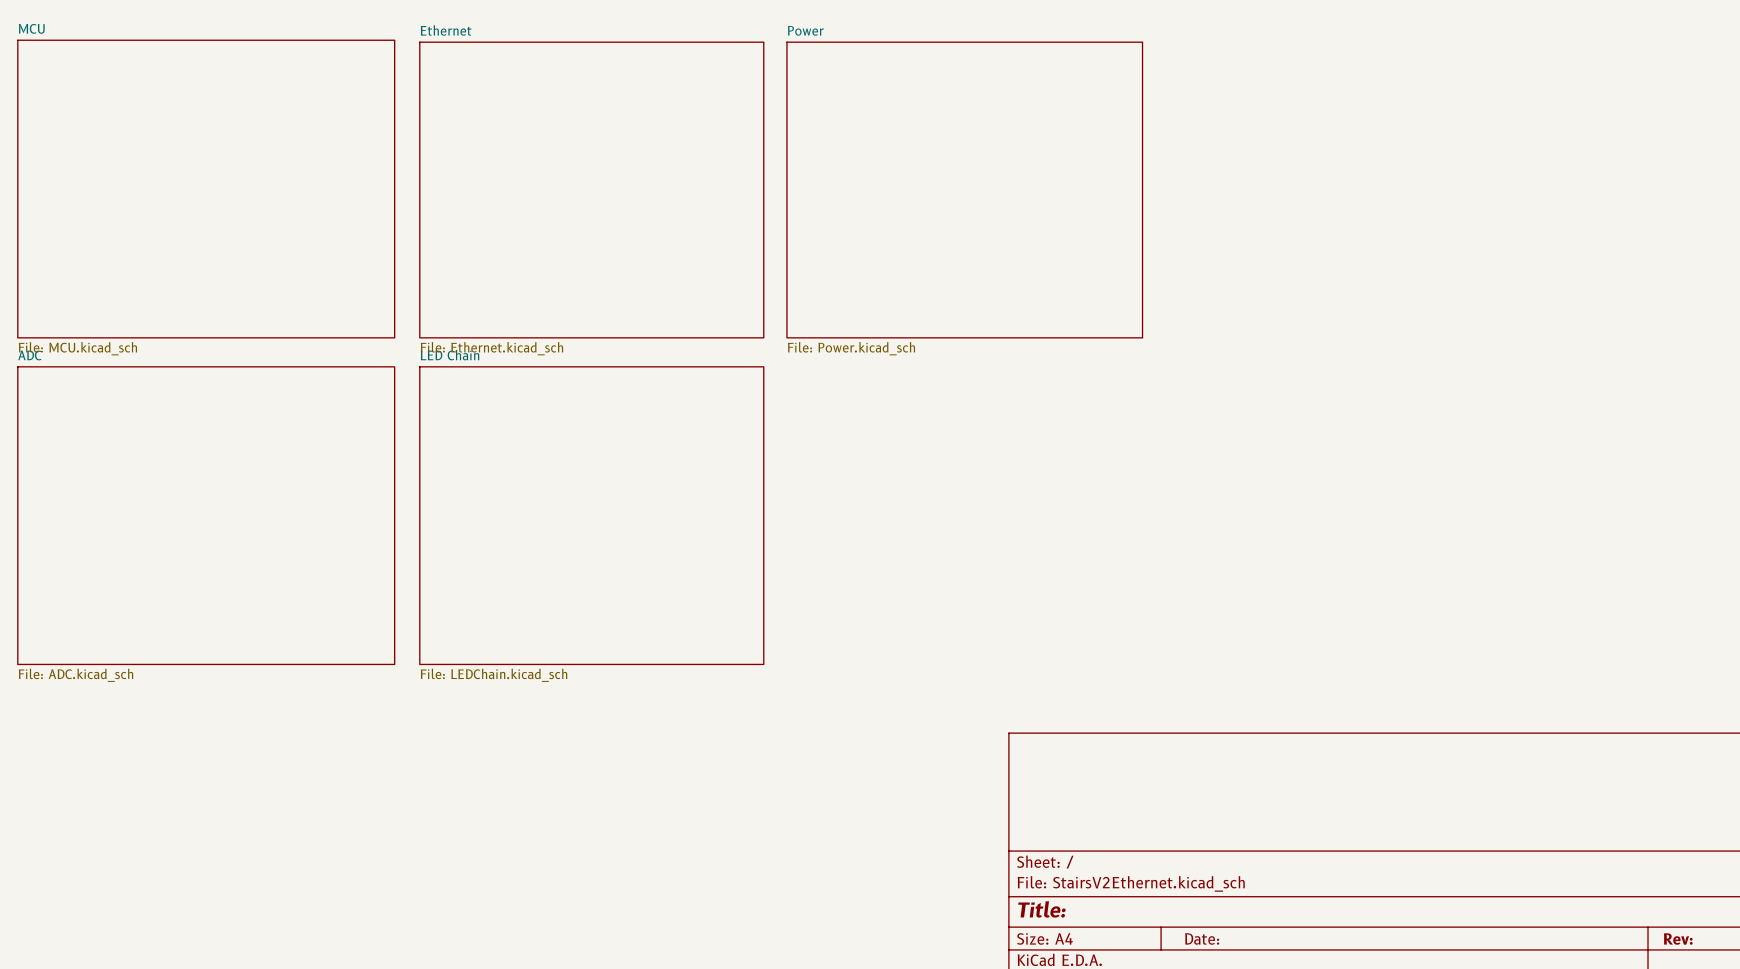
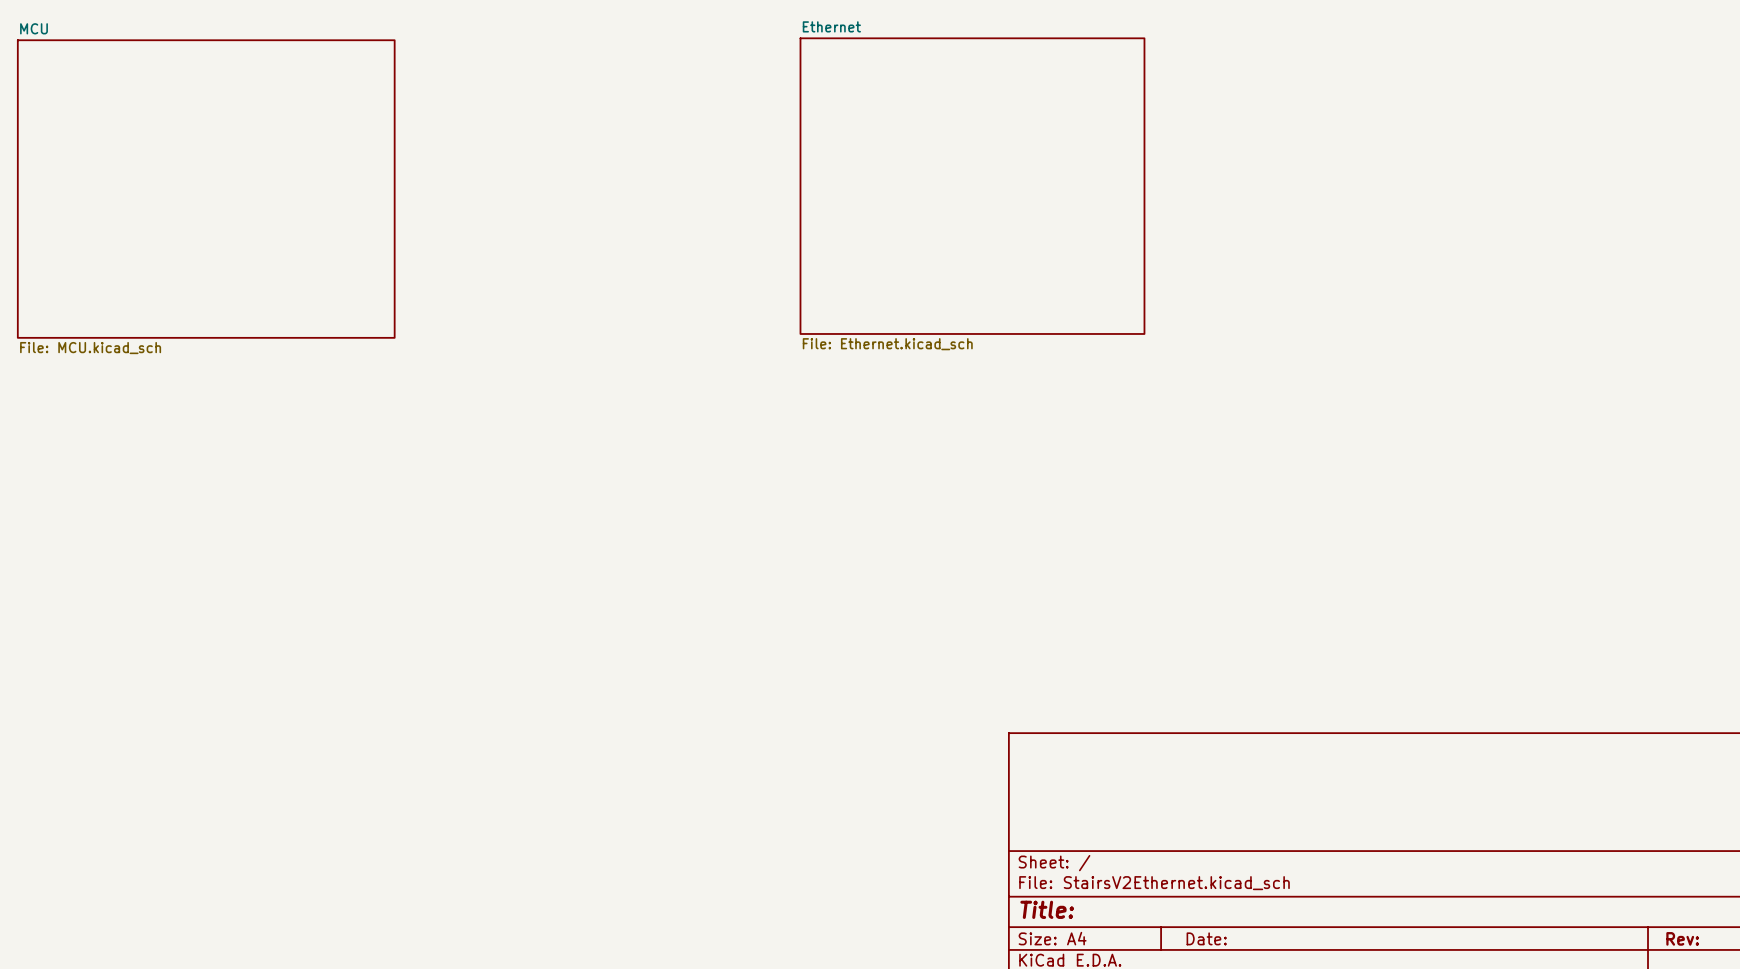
sheet Ethernet: none -> File: Ethernet.kicad_sch (972, 186)
sheet Ethernet: File: Ethernet.kicad_sch (591, 190) -> none
sheet Power: File: Power.kicad_sch (964, 190) -> none
sheet ADC: File: ADC.kicad_sch (206, 515) -> none
sheet LED Chain: File: LEDChain.kicad_sch (591, 515) -> none

